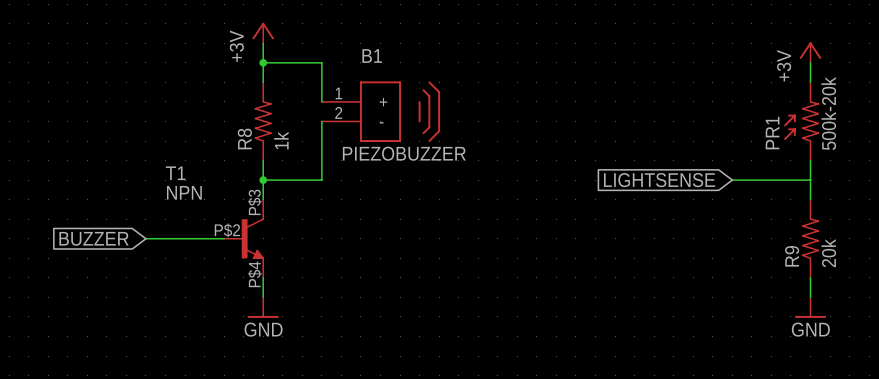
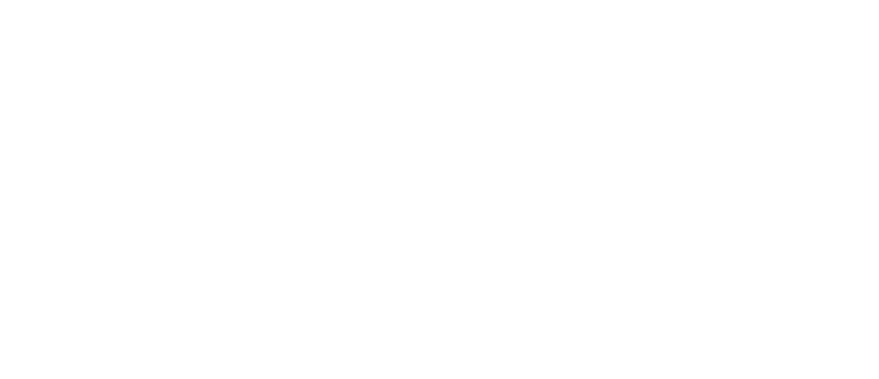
power symbol: +3V (263, 33) -> none
wire: (263, 43) (263, 82) -> none
power symbol: +3V (810, 52) -> none
wire: (263, 62) (321, 62) (321, 101) -> none
junction: (263, 62) -> none
wire: (810, 62) (810, 82) -> none
B1: PIEZOBUZZER (380, 111) -> none
R8: 1k (263, 121) -> none
wire: (321, 121) (321, 180) (263, 180) -> none
PR1: 500k-20k (801, 121) -> none
wire: (263, 160) (263, 199) -> none
wire: (810, 160) (810, 199) -> none
junction: (263, 180) -> none
global label: LIGHTSENSE (659, 180) -> none
wire: (732, 180) (810, 180) -> none
global label: BUZZER (94, 238) -> none
wire: (145, 238) (224, 238) -> none
T1: NPN (243, 238) -> none
R9: 20k (810, 238) -> none
wire: (263, 277) (263, 297) -> none
wire: (810, 277) (810, 297) -> none
power symbol: GND (263, 307) -> none
power symbol: GND (810, 307) -> none

